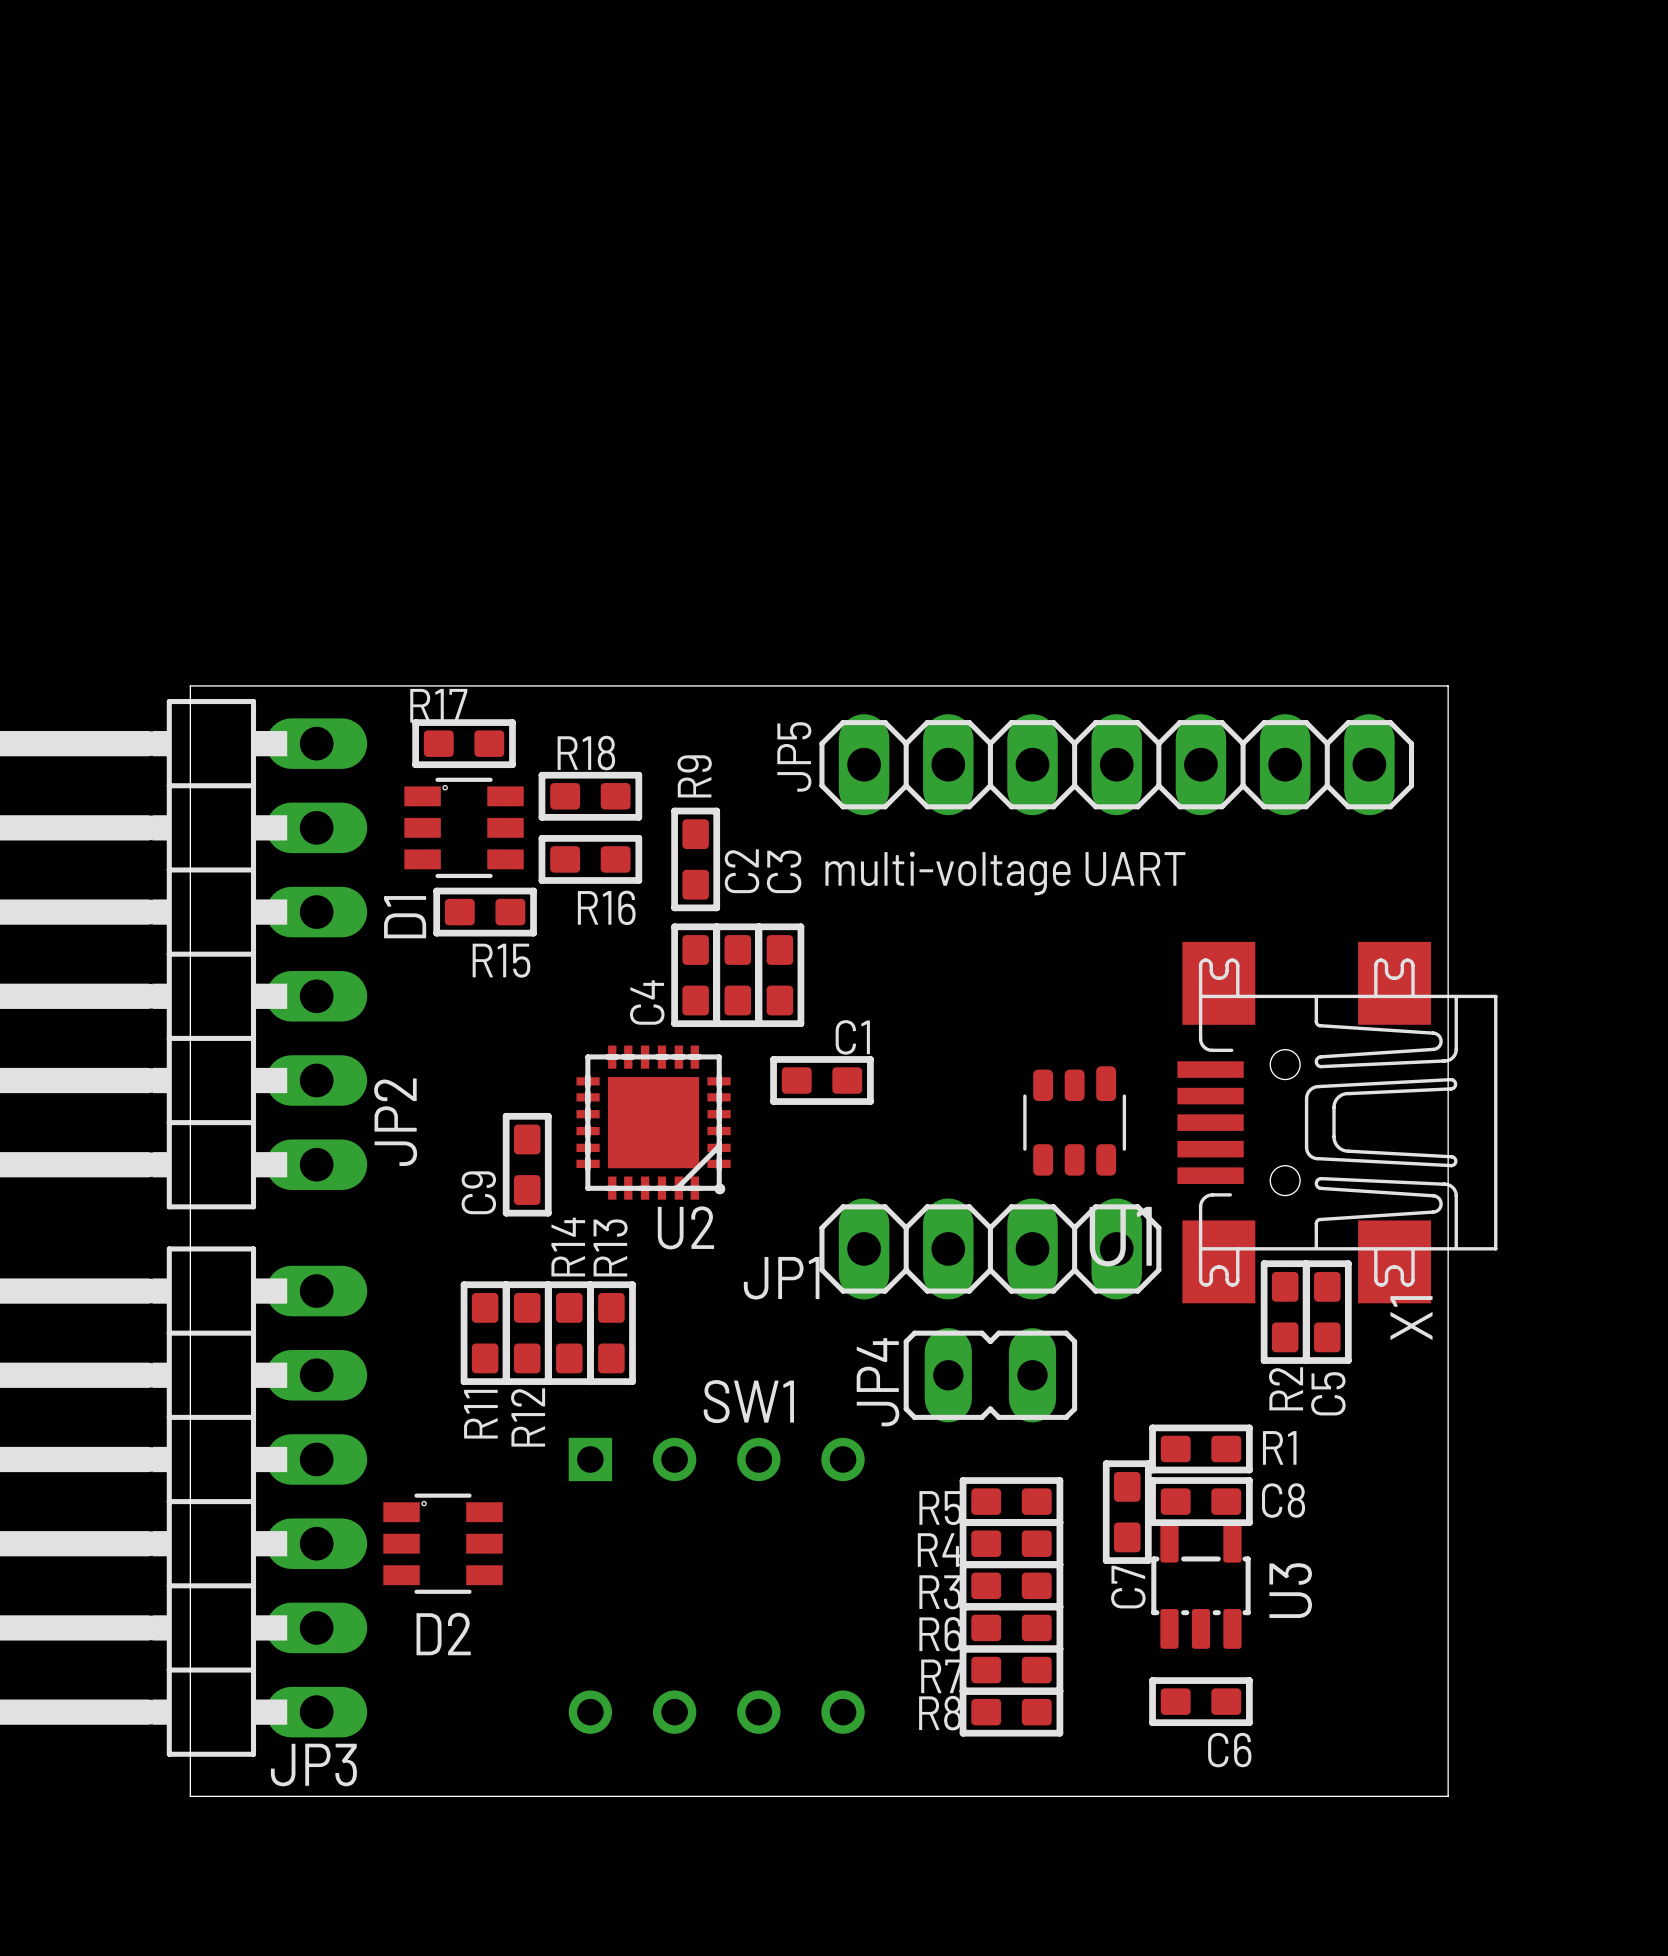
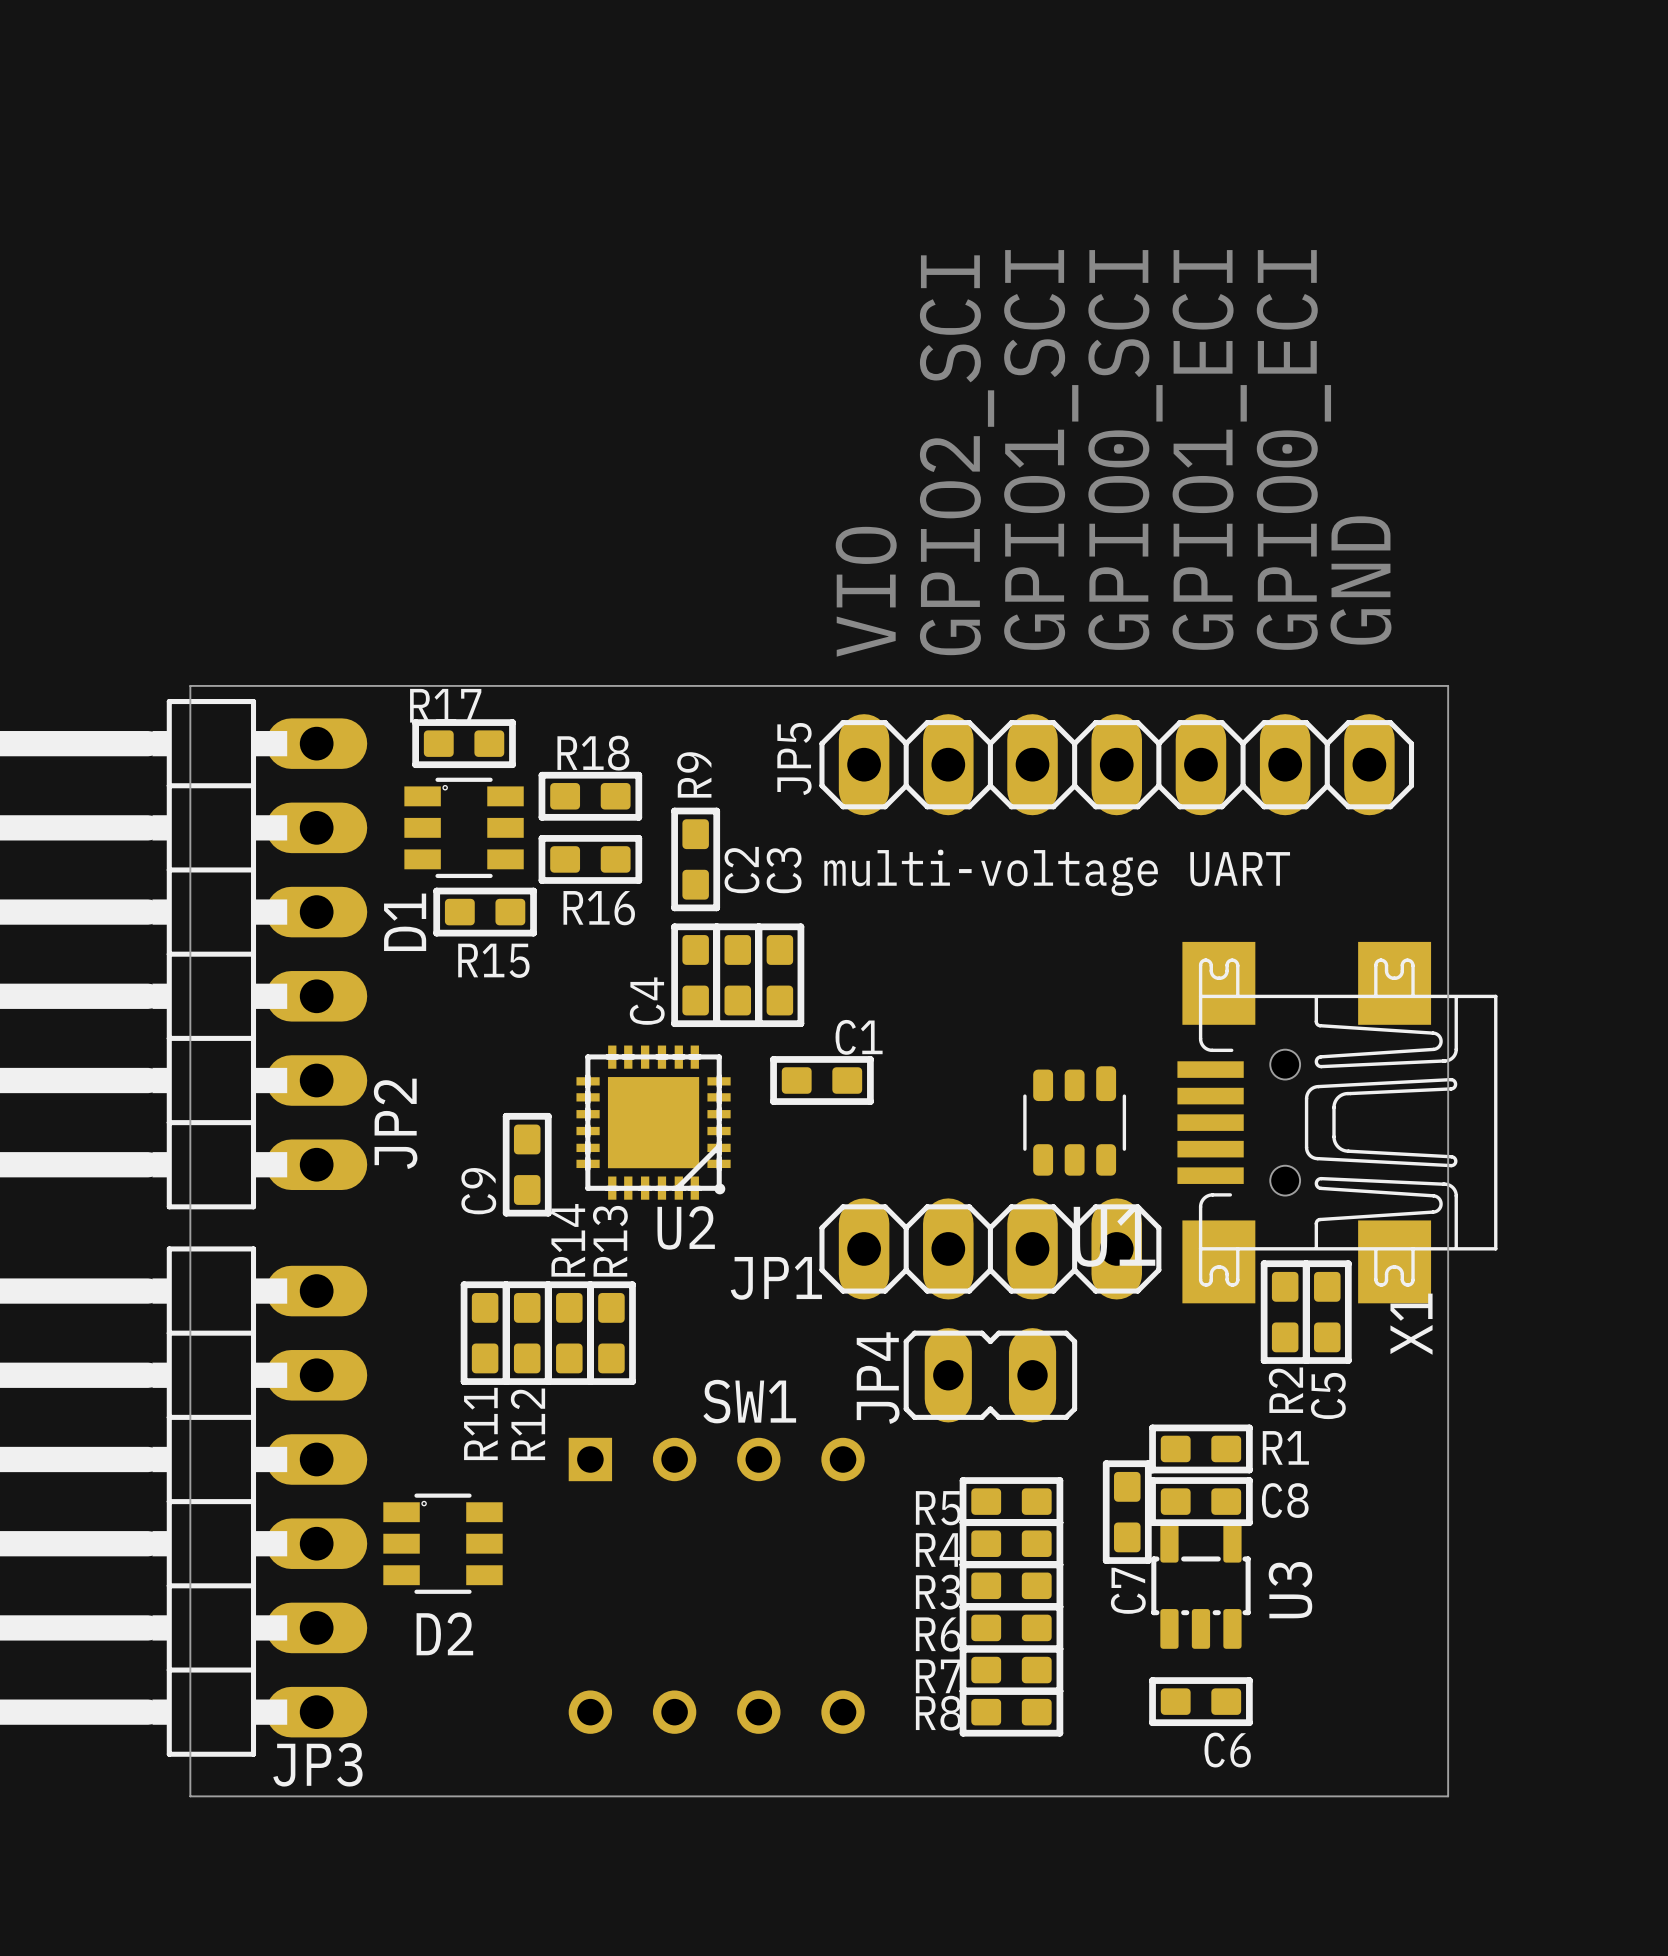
text: none -> GPIO0_ECI (1293, 449)
text: none -> GPIO0_SCI (1125, 449)
text: none -> GPIO2_SCI (957, 455)
text: none -> GPIO1_ECI (1209, 449)
text: none -> GPIO1_SCI (1041, 449)
text: none -> GND (1360, 580)
text: none -> VIO (866, 591)

